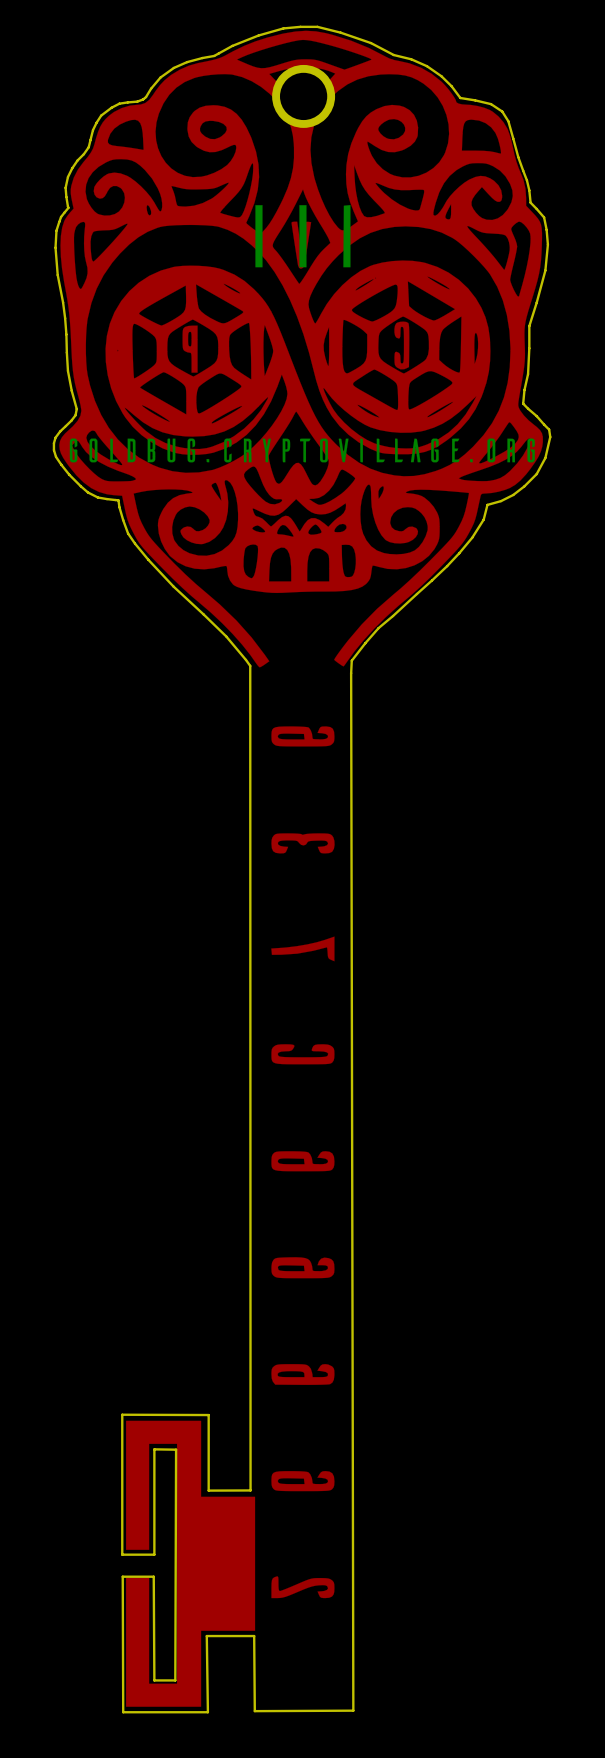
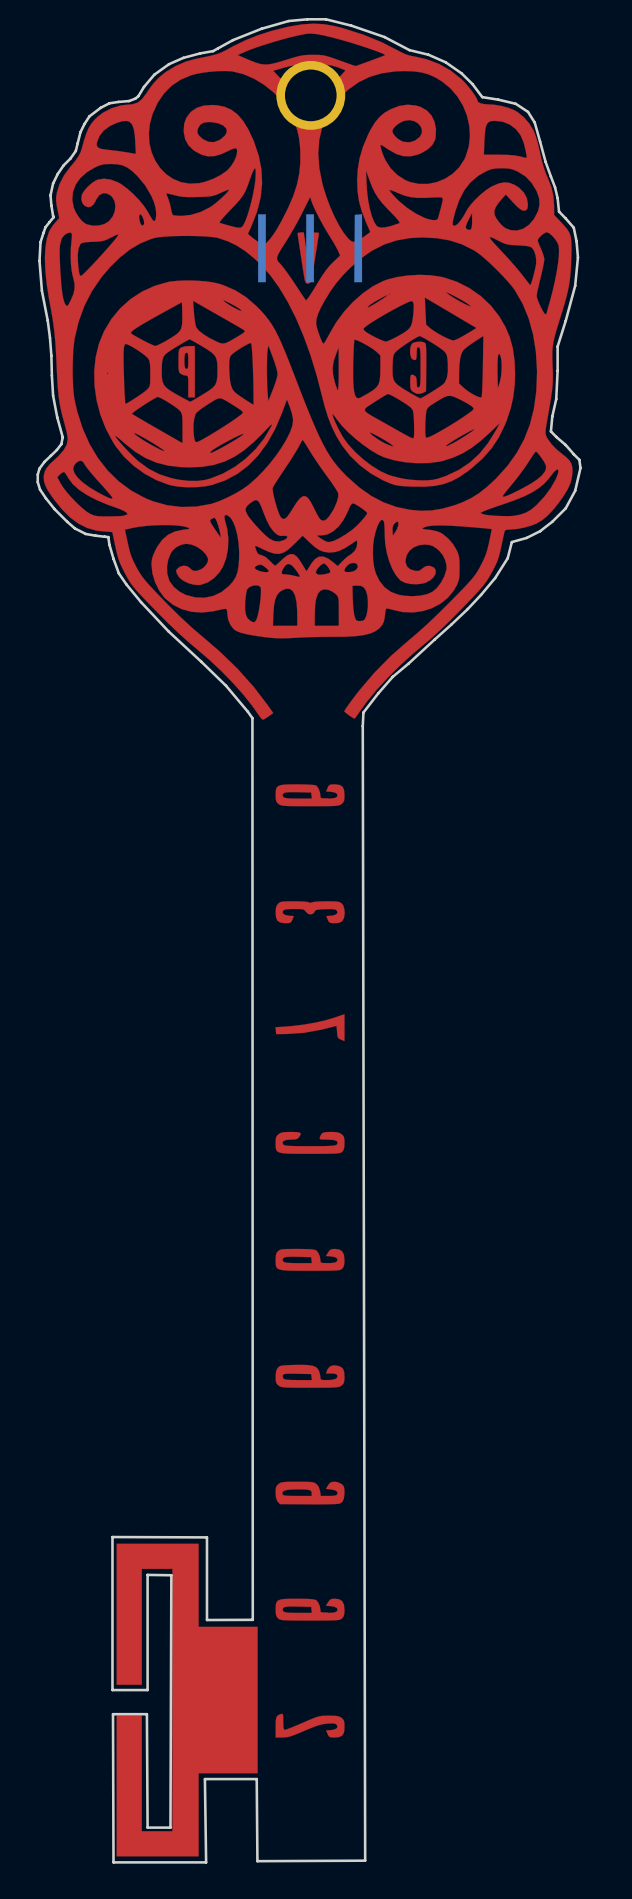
drawing: [69, 438, 535, 463] -> none

